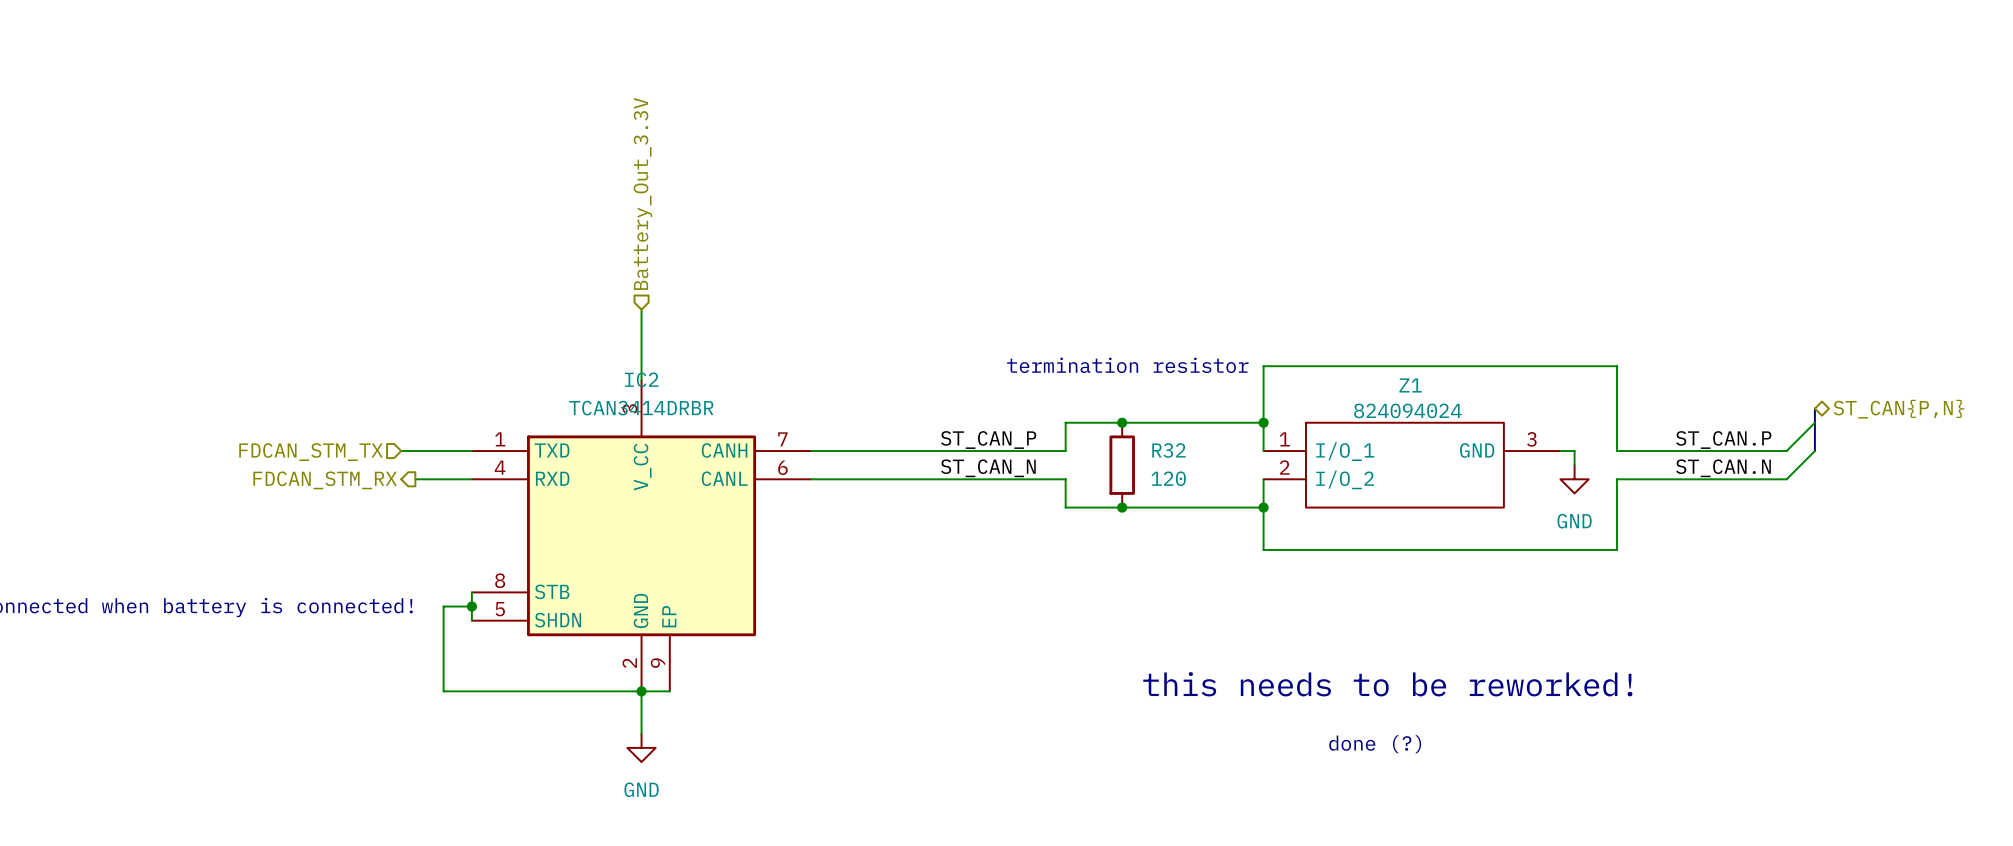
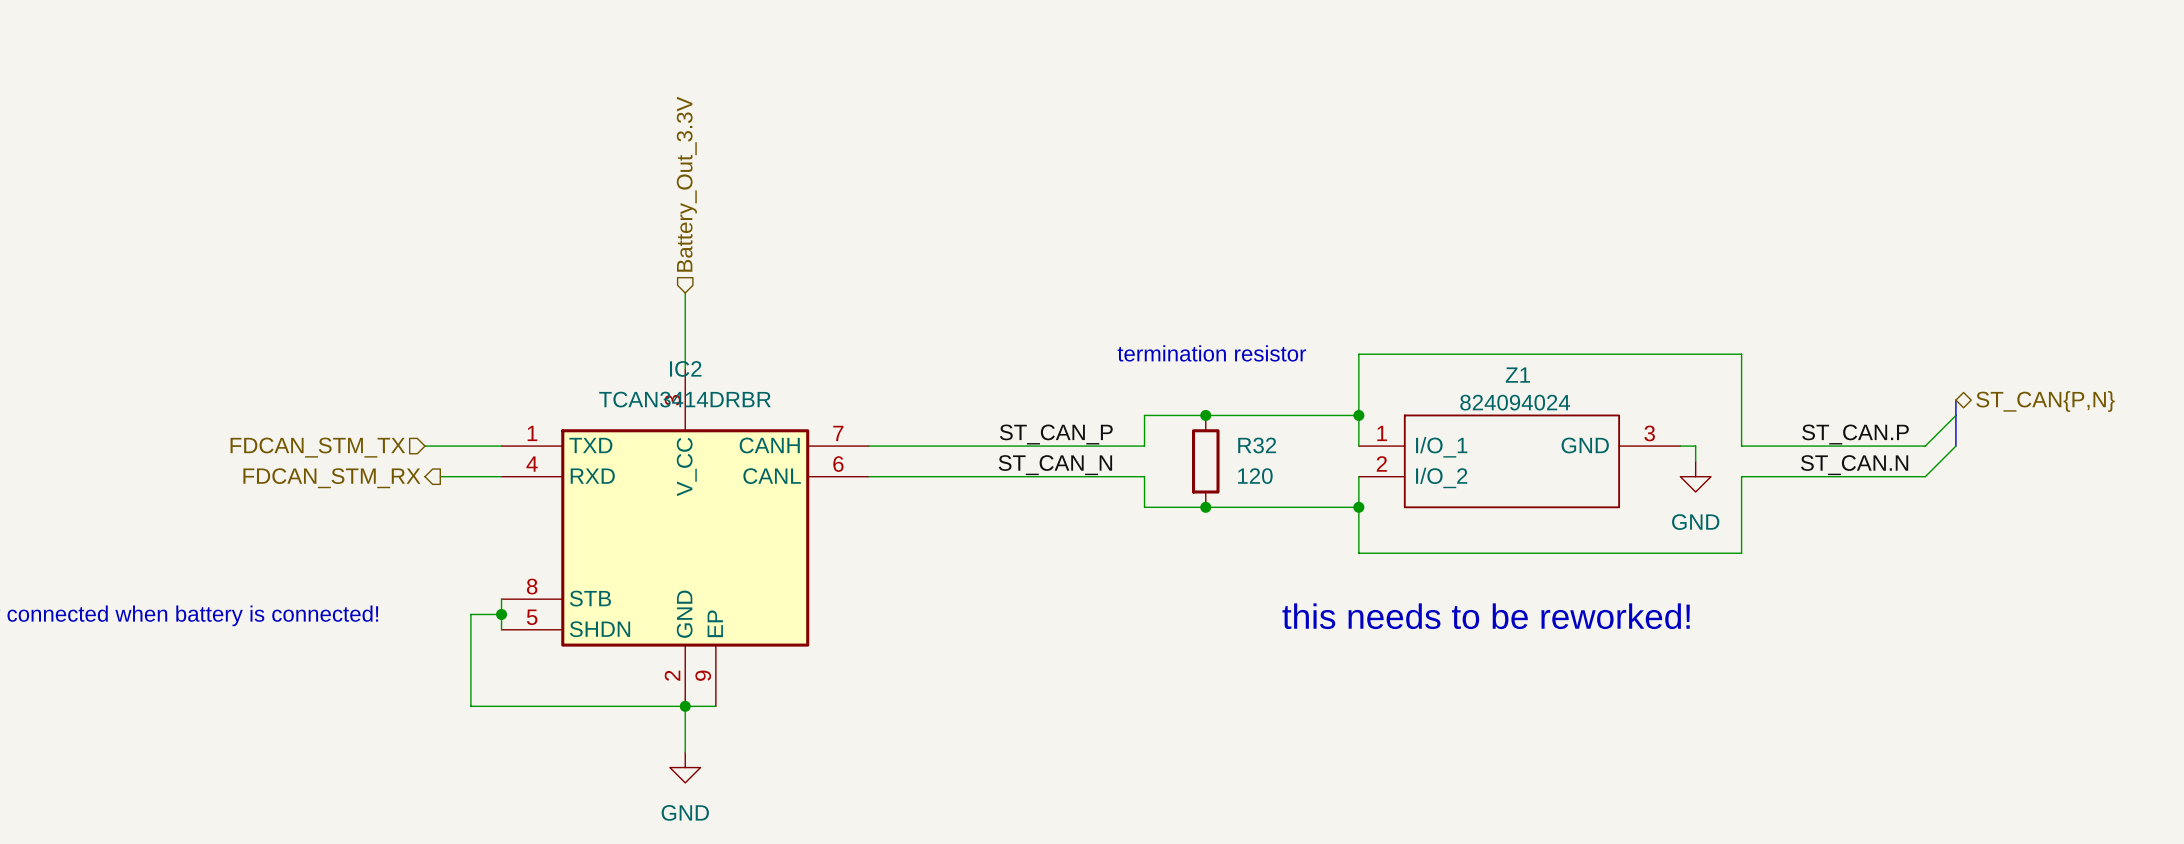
text position: this needs to be reworked! (1387, 684) -> this needs to be reworked! (1486, 616)
text: done (?) (1375, 744) -> none

